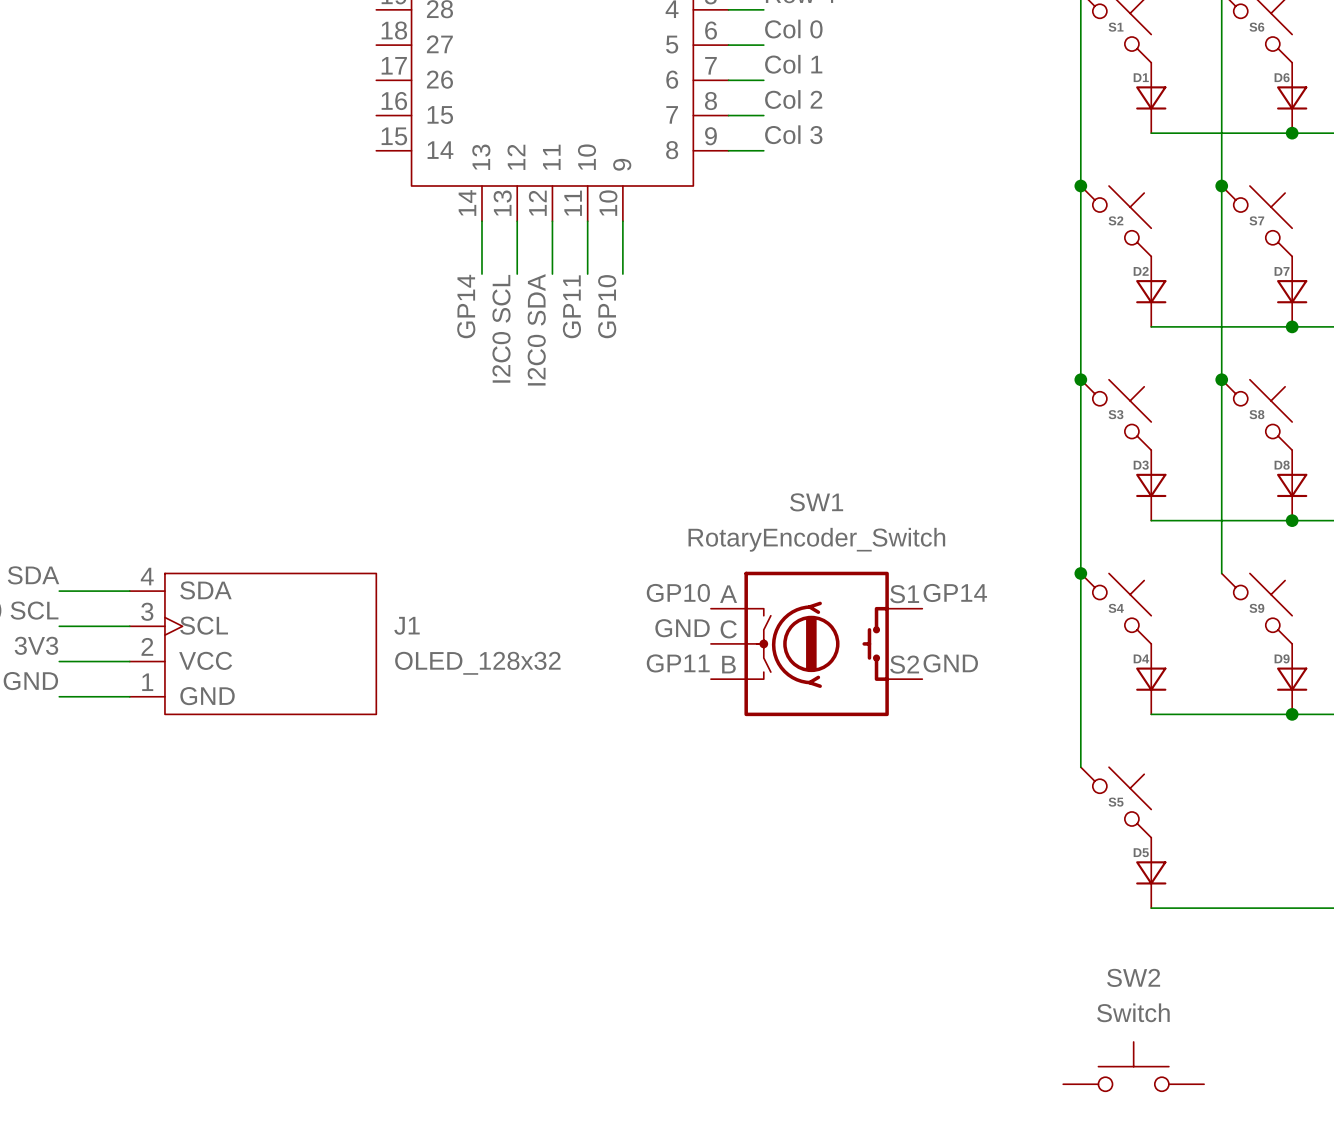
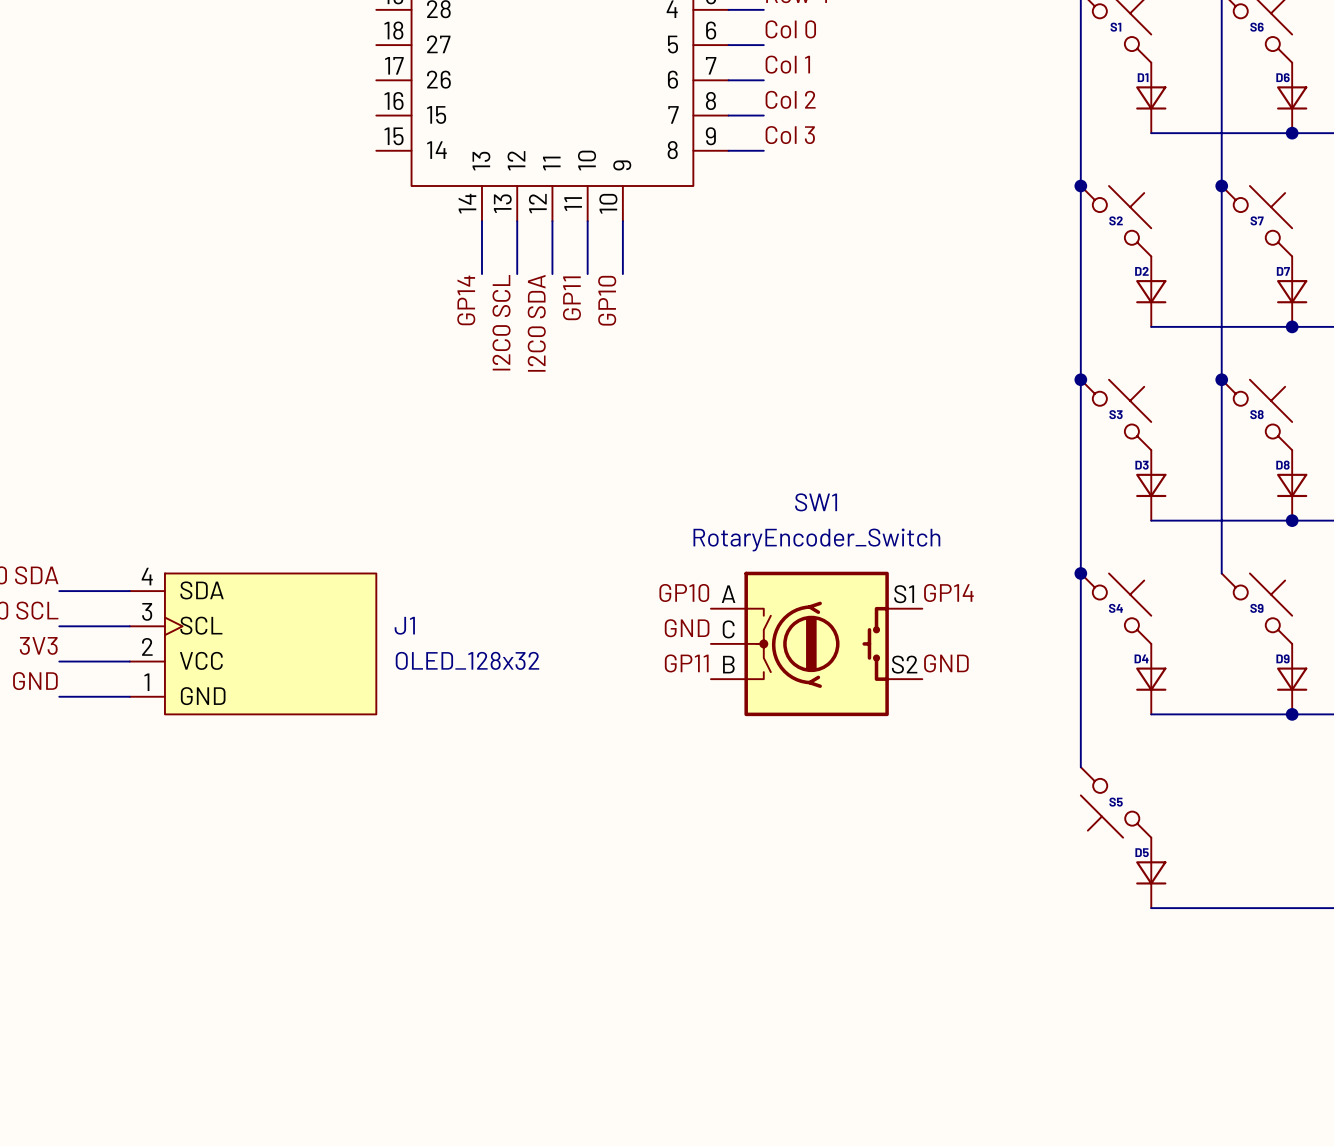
S5 rotation: 0° (1116, 802) -> 180° (1116, 802)
SW2: Switch (1133, 1066) -> none

